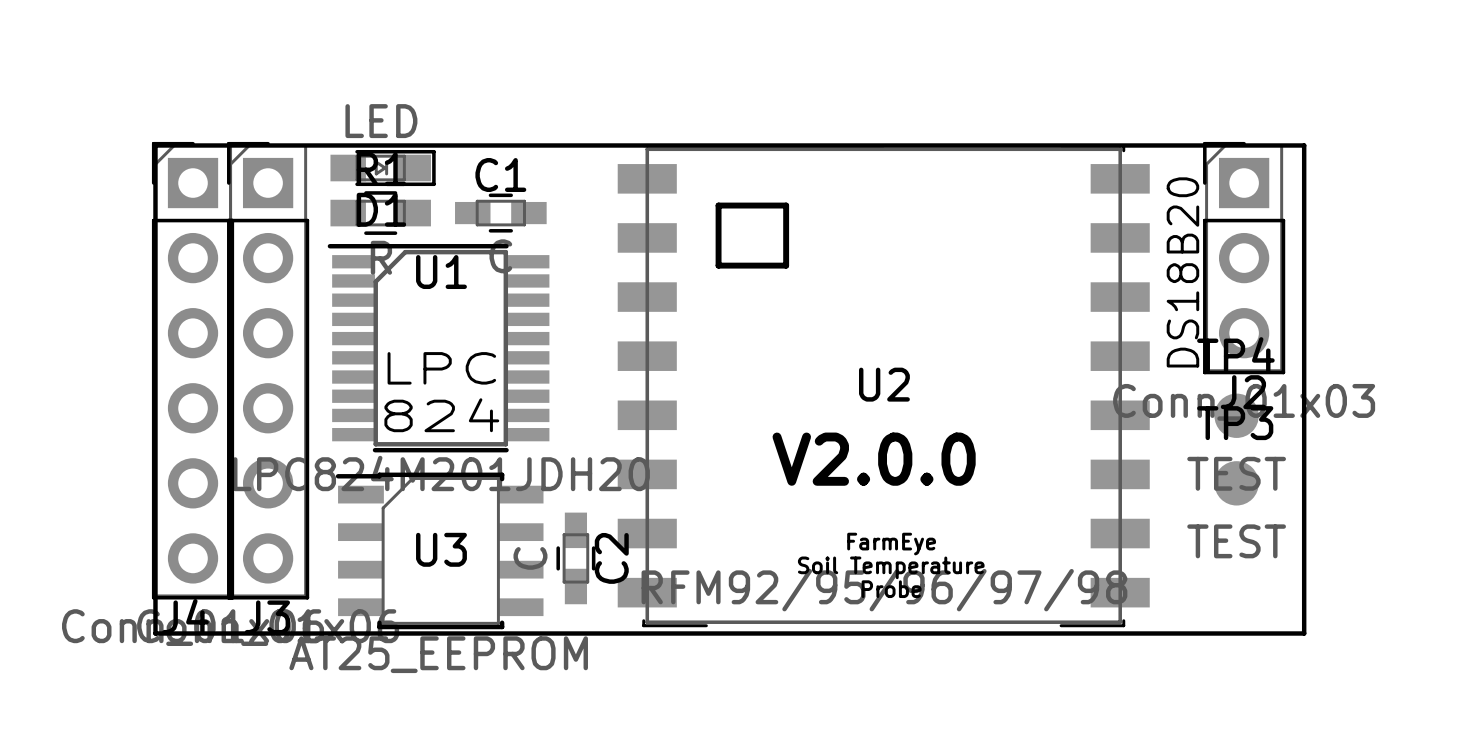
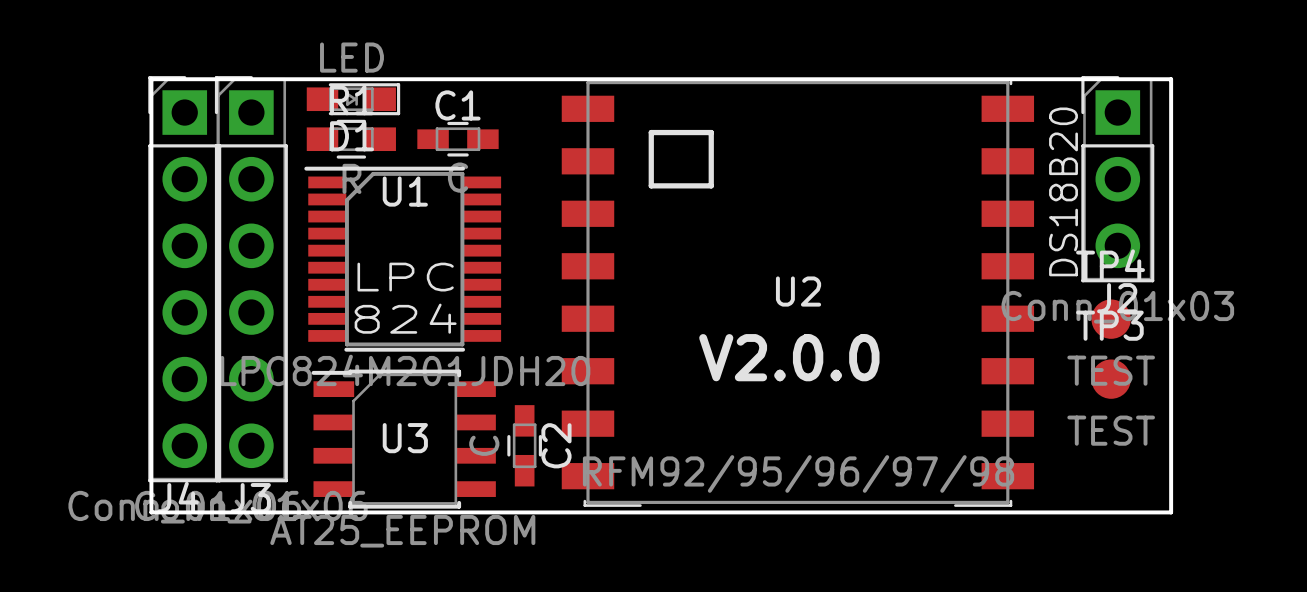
text: FarmEye (891, 544) -> none
text: Soil Temperature (891, 567) -> none
text: Probe (891, 589) -> none

